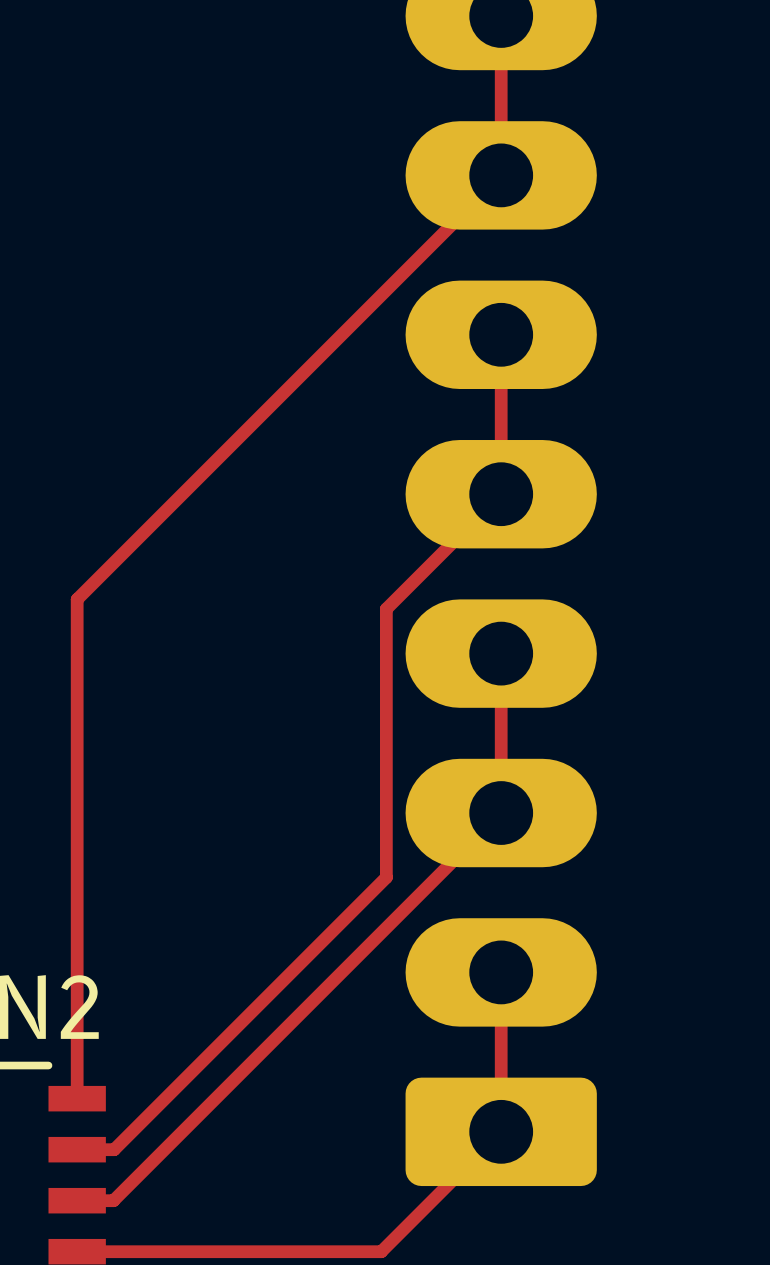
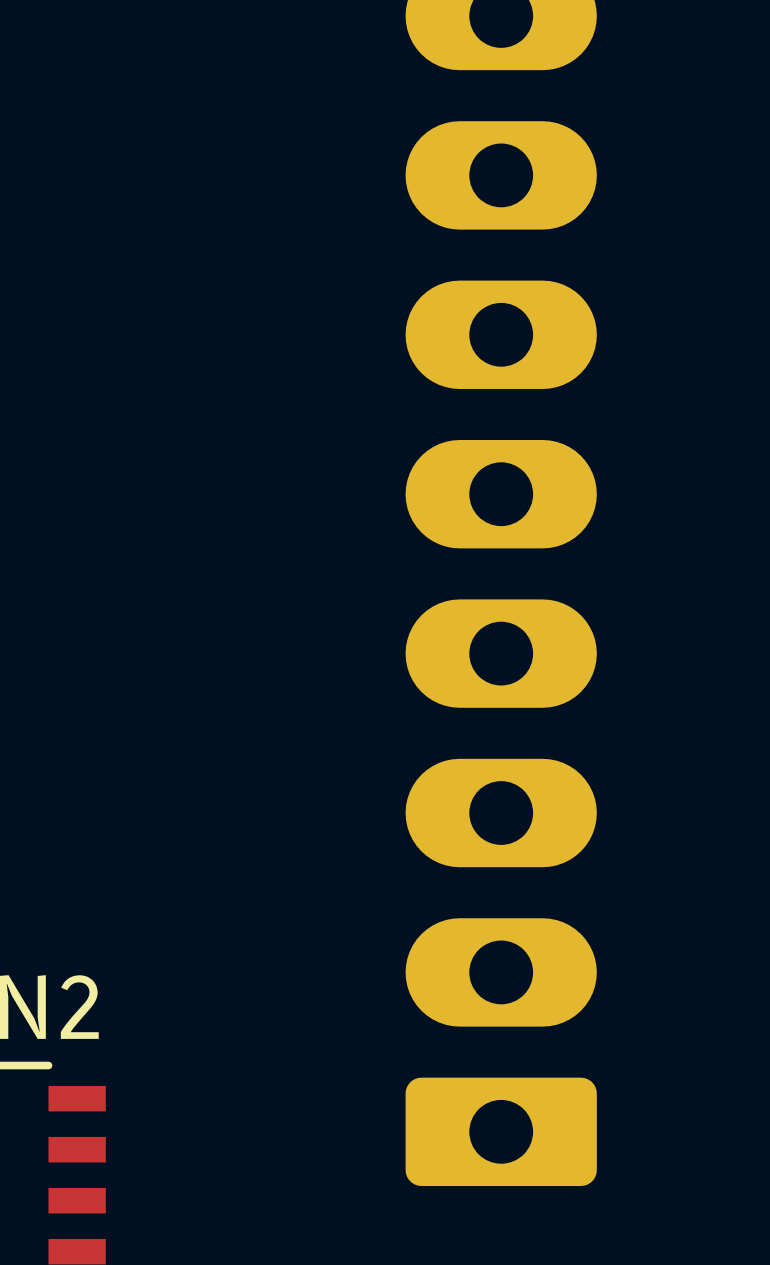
track: (501, 15) (501, 175) (77, 599) (77, 1098) -> none
track: (501, 334) (501, 494) (386, 609) (386, 877) (114, 1149) (77, 1149) -> none
track: (501, 653) (501, 813) (113, 1200) (77, 1200) -> none
track: (501, 972) (501, 1131) (381, 1251) (77, 1251) -> none

